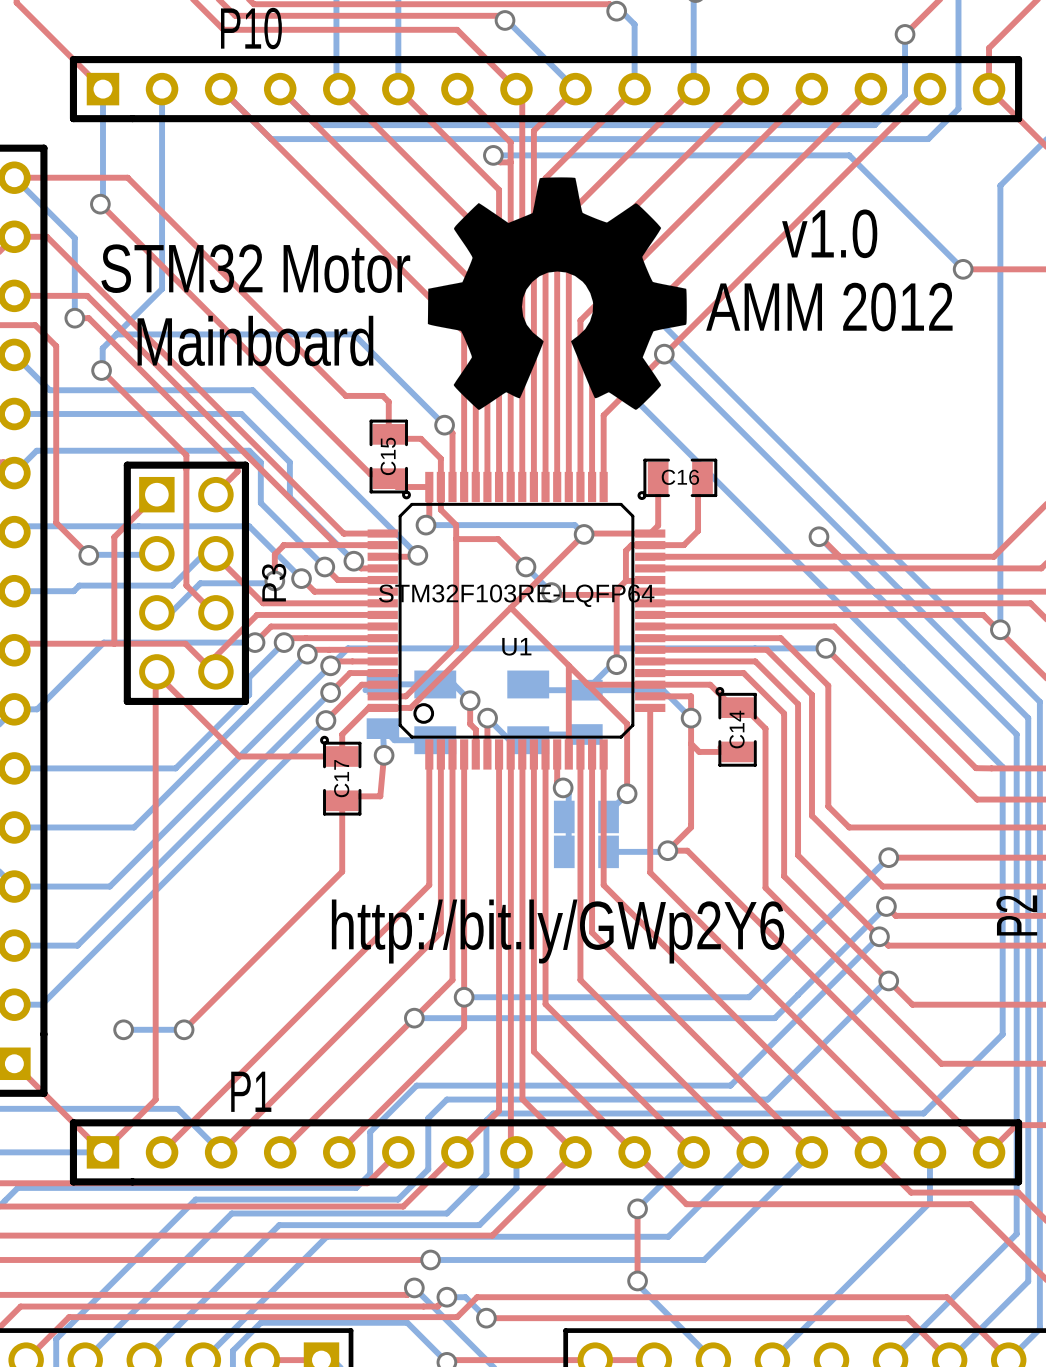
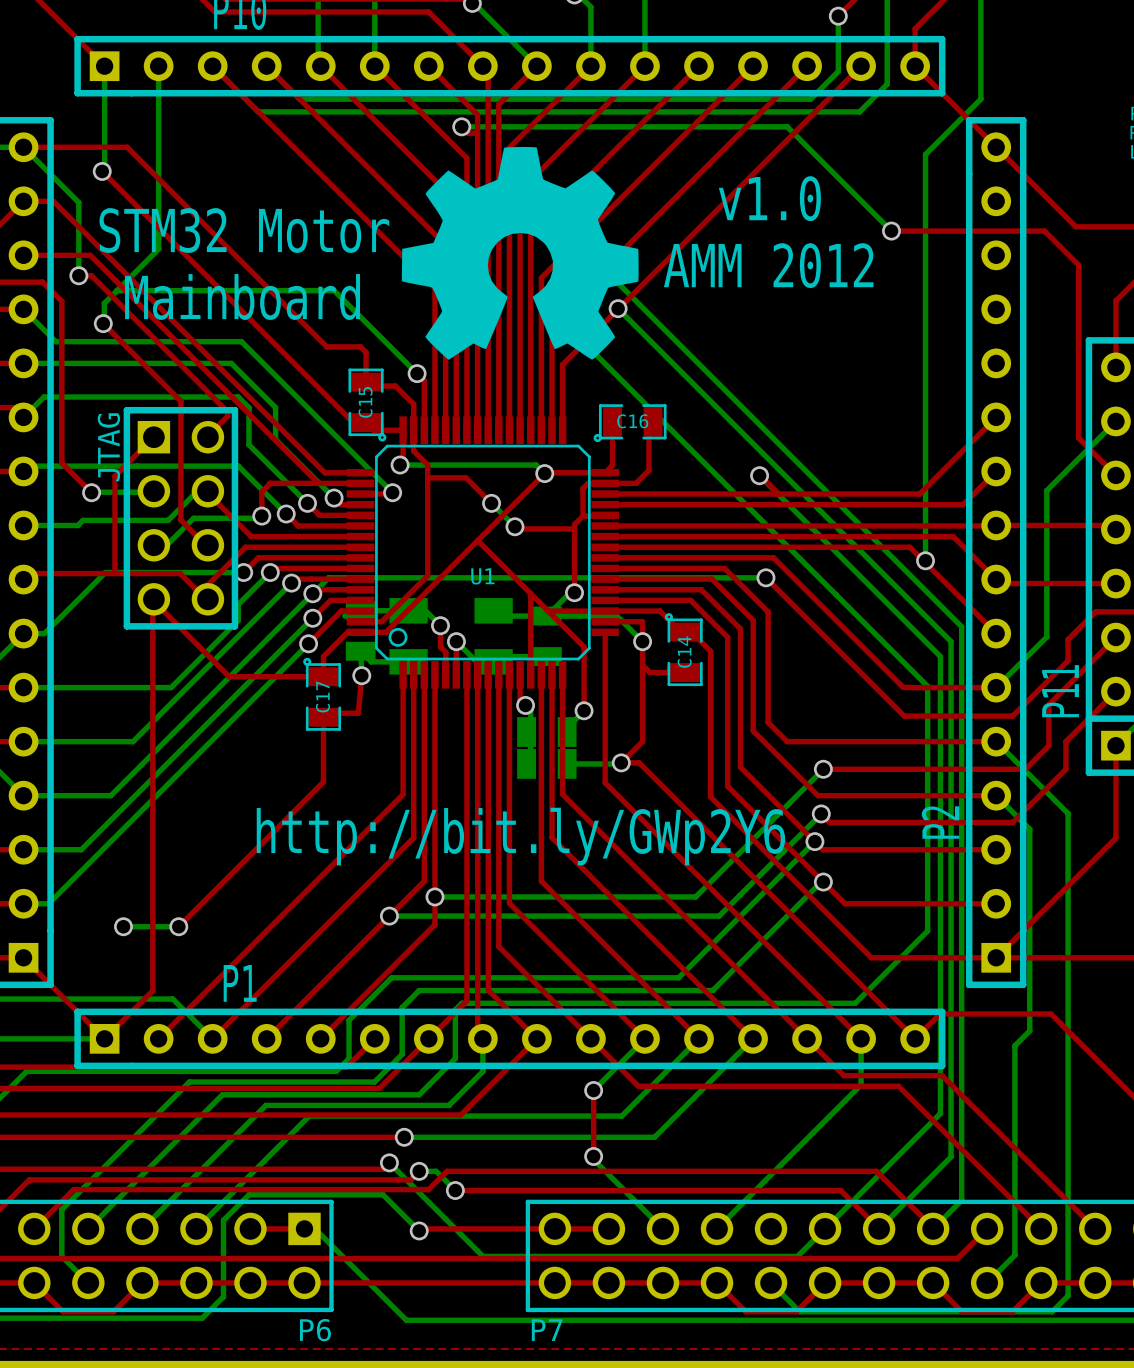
P3 name: P3 (274, 582) -> JTAG (108, 447)
U1 value: STM32F103RE-LQFP64 (516, 595) -> none

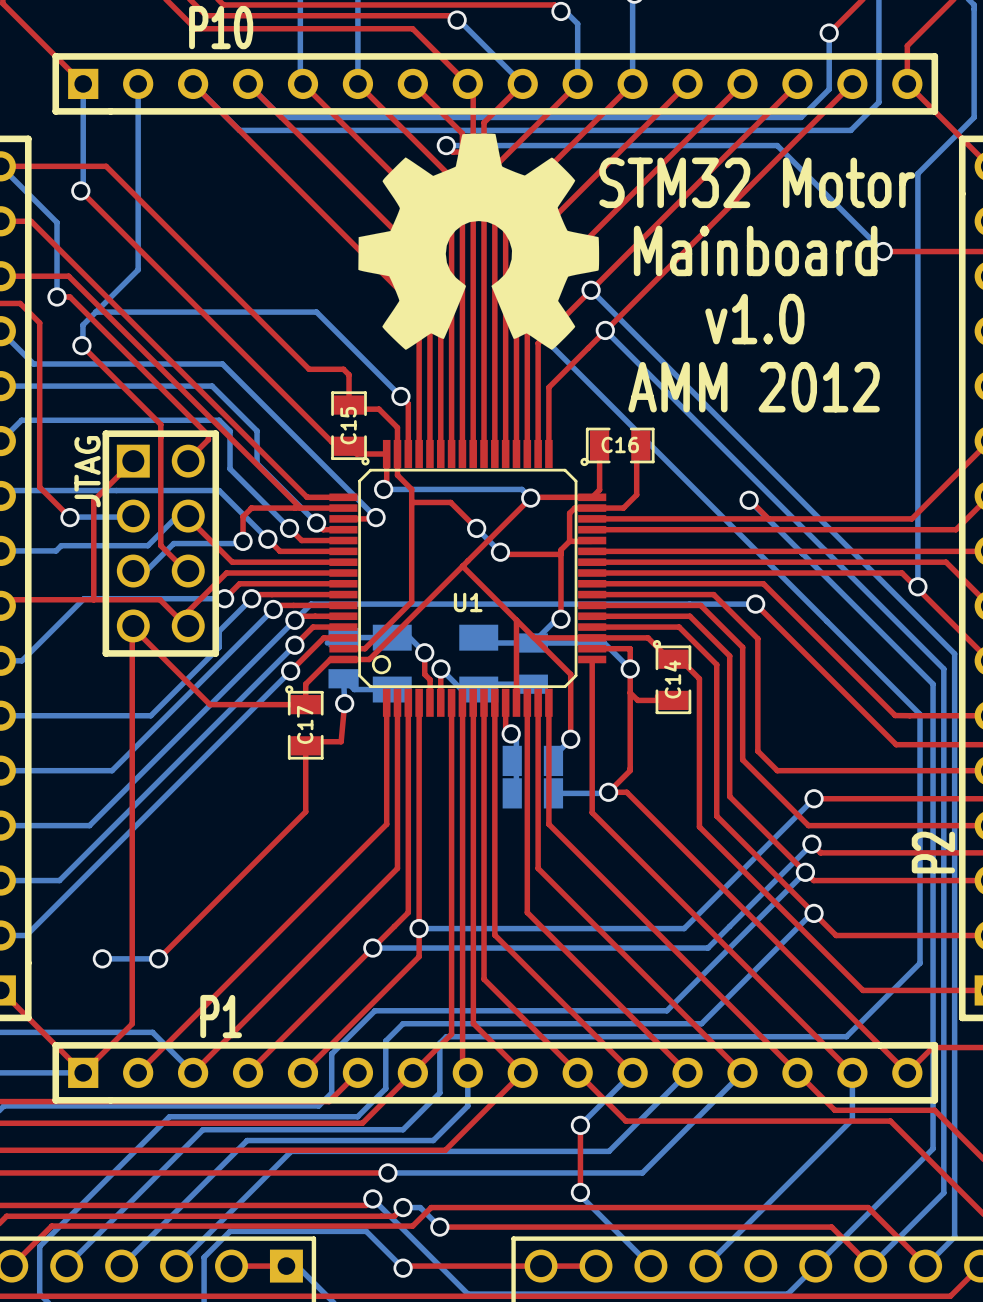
text position: v1.0 (769, 198) -> v1.0 (754, 319)
text position: STM32 Motor (244, 230) -> STM32 Motor (757, 182)
drawing position: (520, 253) -> (478, 241)
text position: AMM 2012 (768, 265) -> AMM 2012 (754, 387)
text position: Mainboard (242, 296) -> Mainboard (755, 250)
text: http://bit.ly/GWp2Y6 (520, 836) -> none

